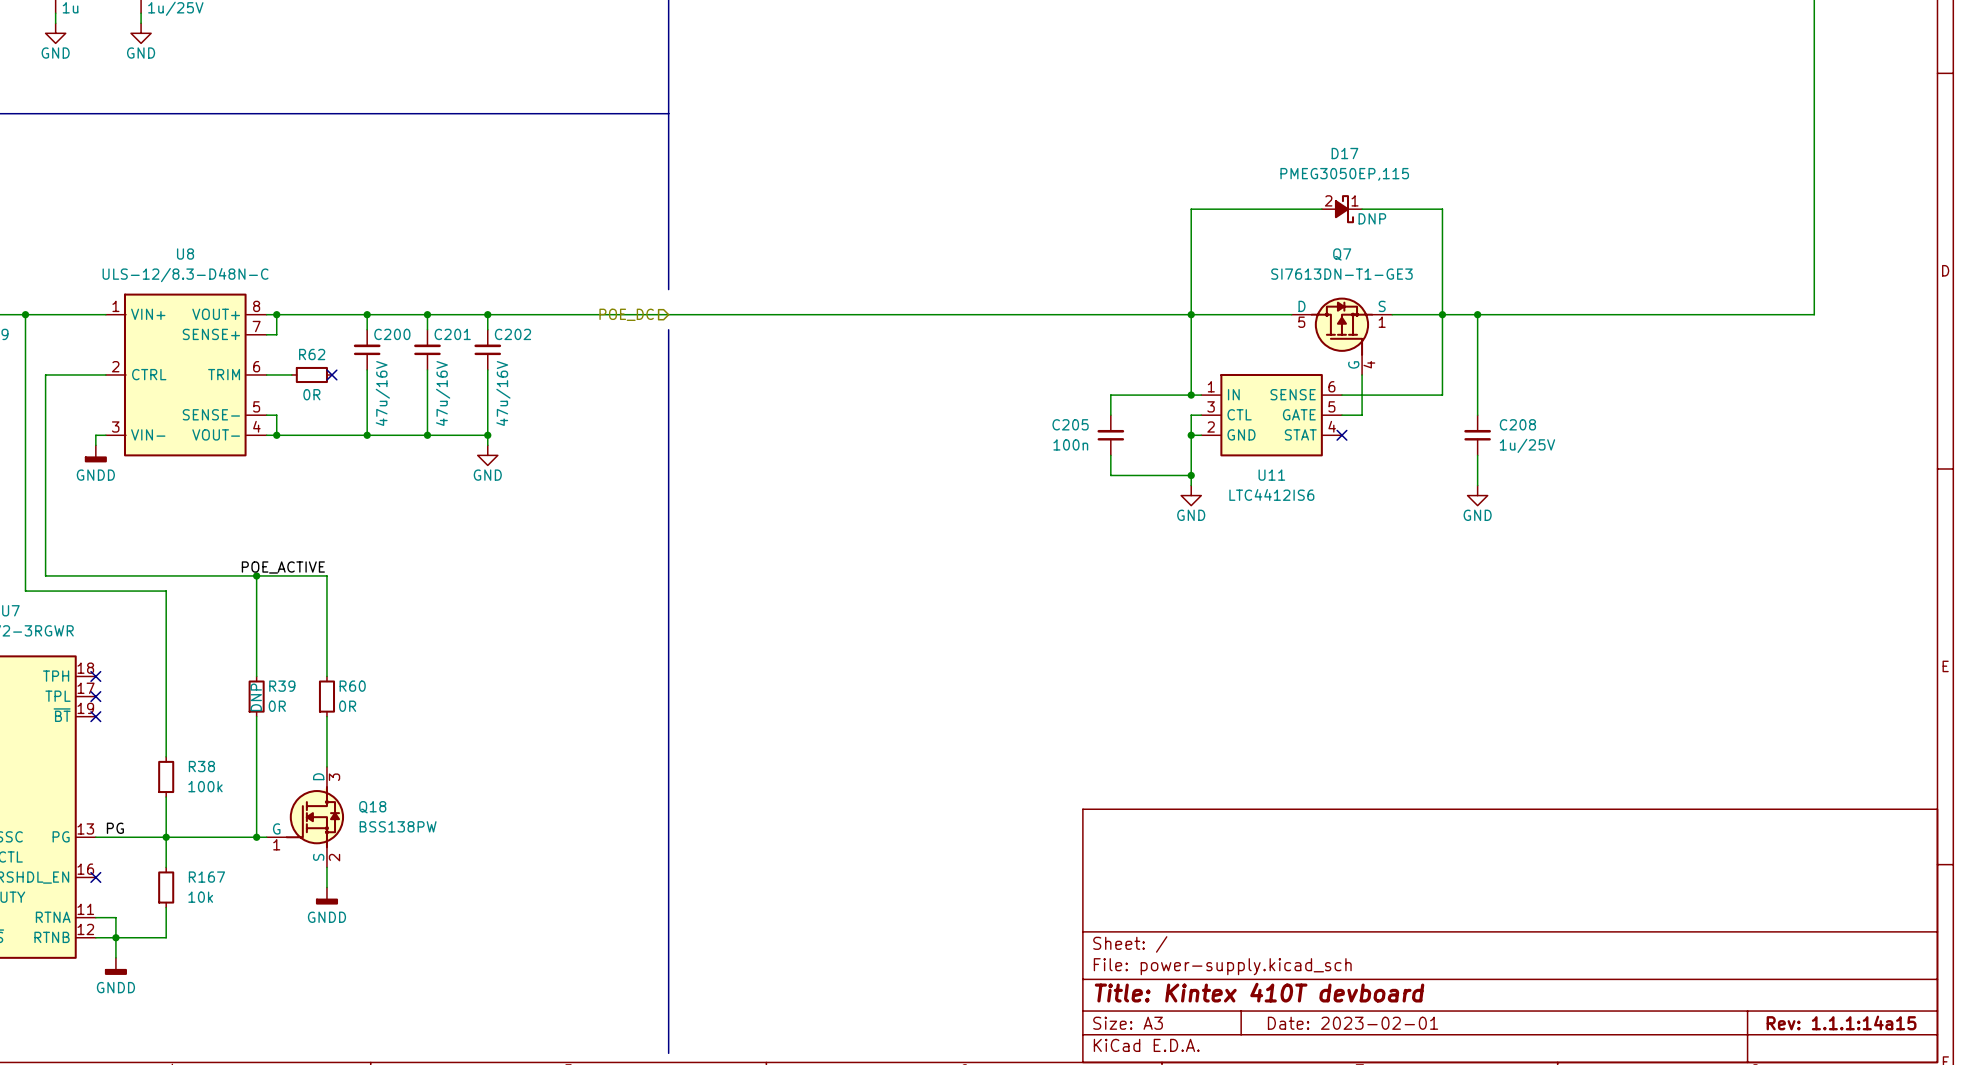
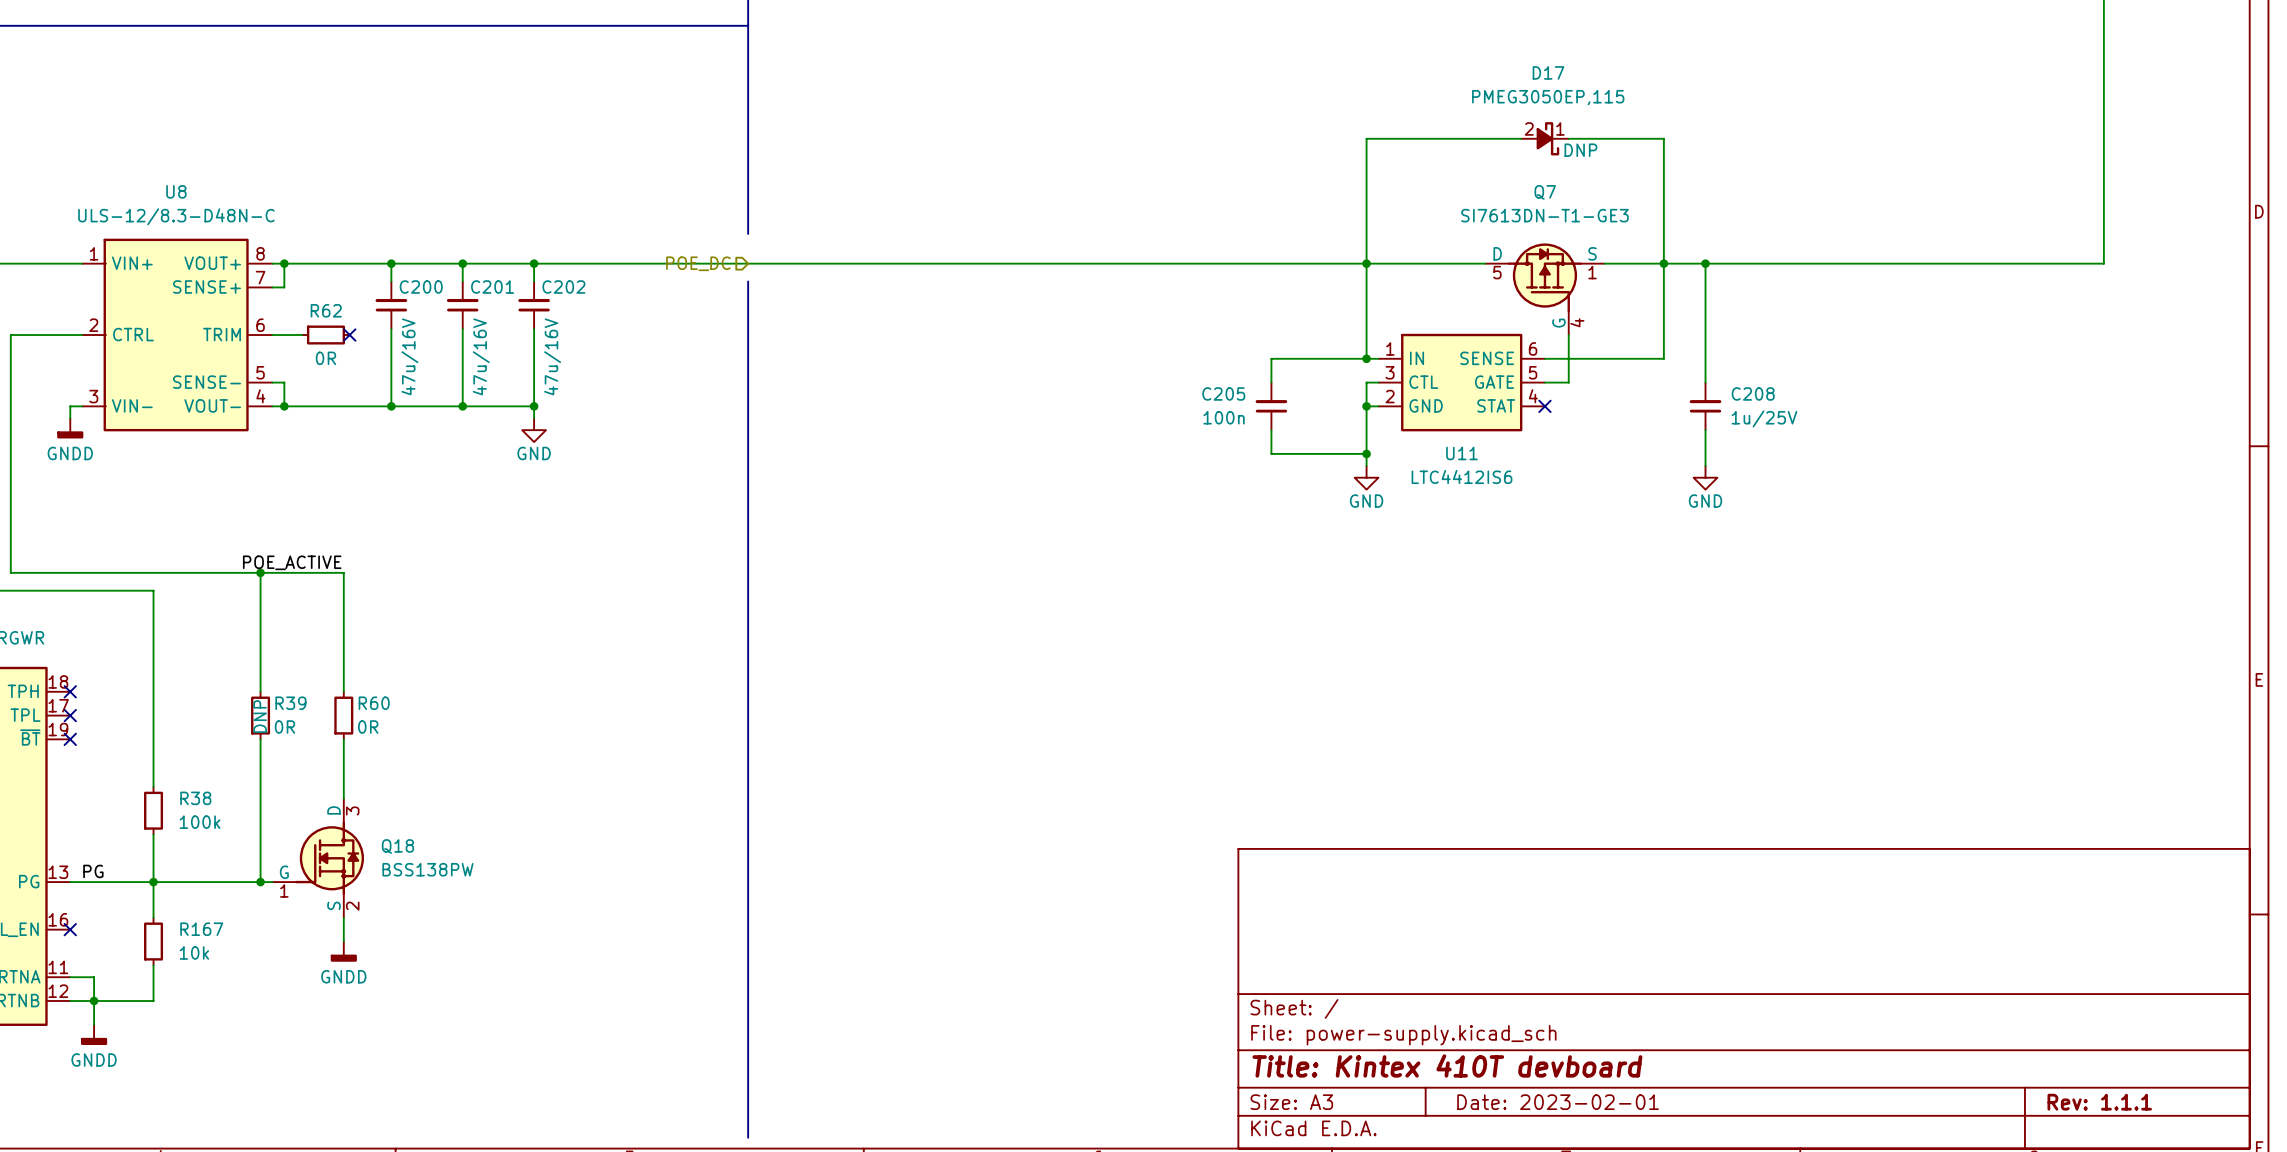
title block: Rev: 1.1.1:14a15 (1841, 1022) -> Rev: 1.1.1 (2099, 1102)

